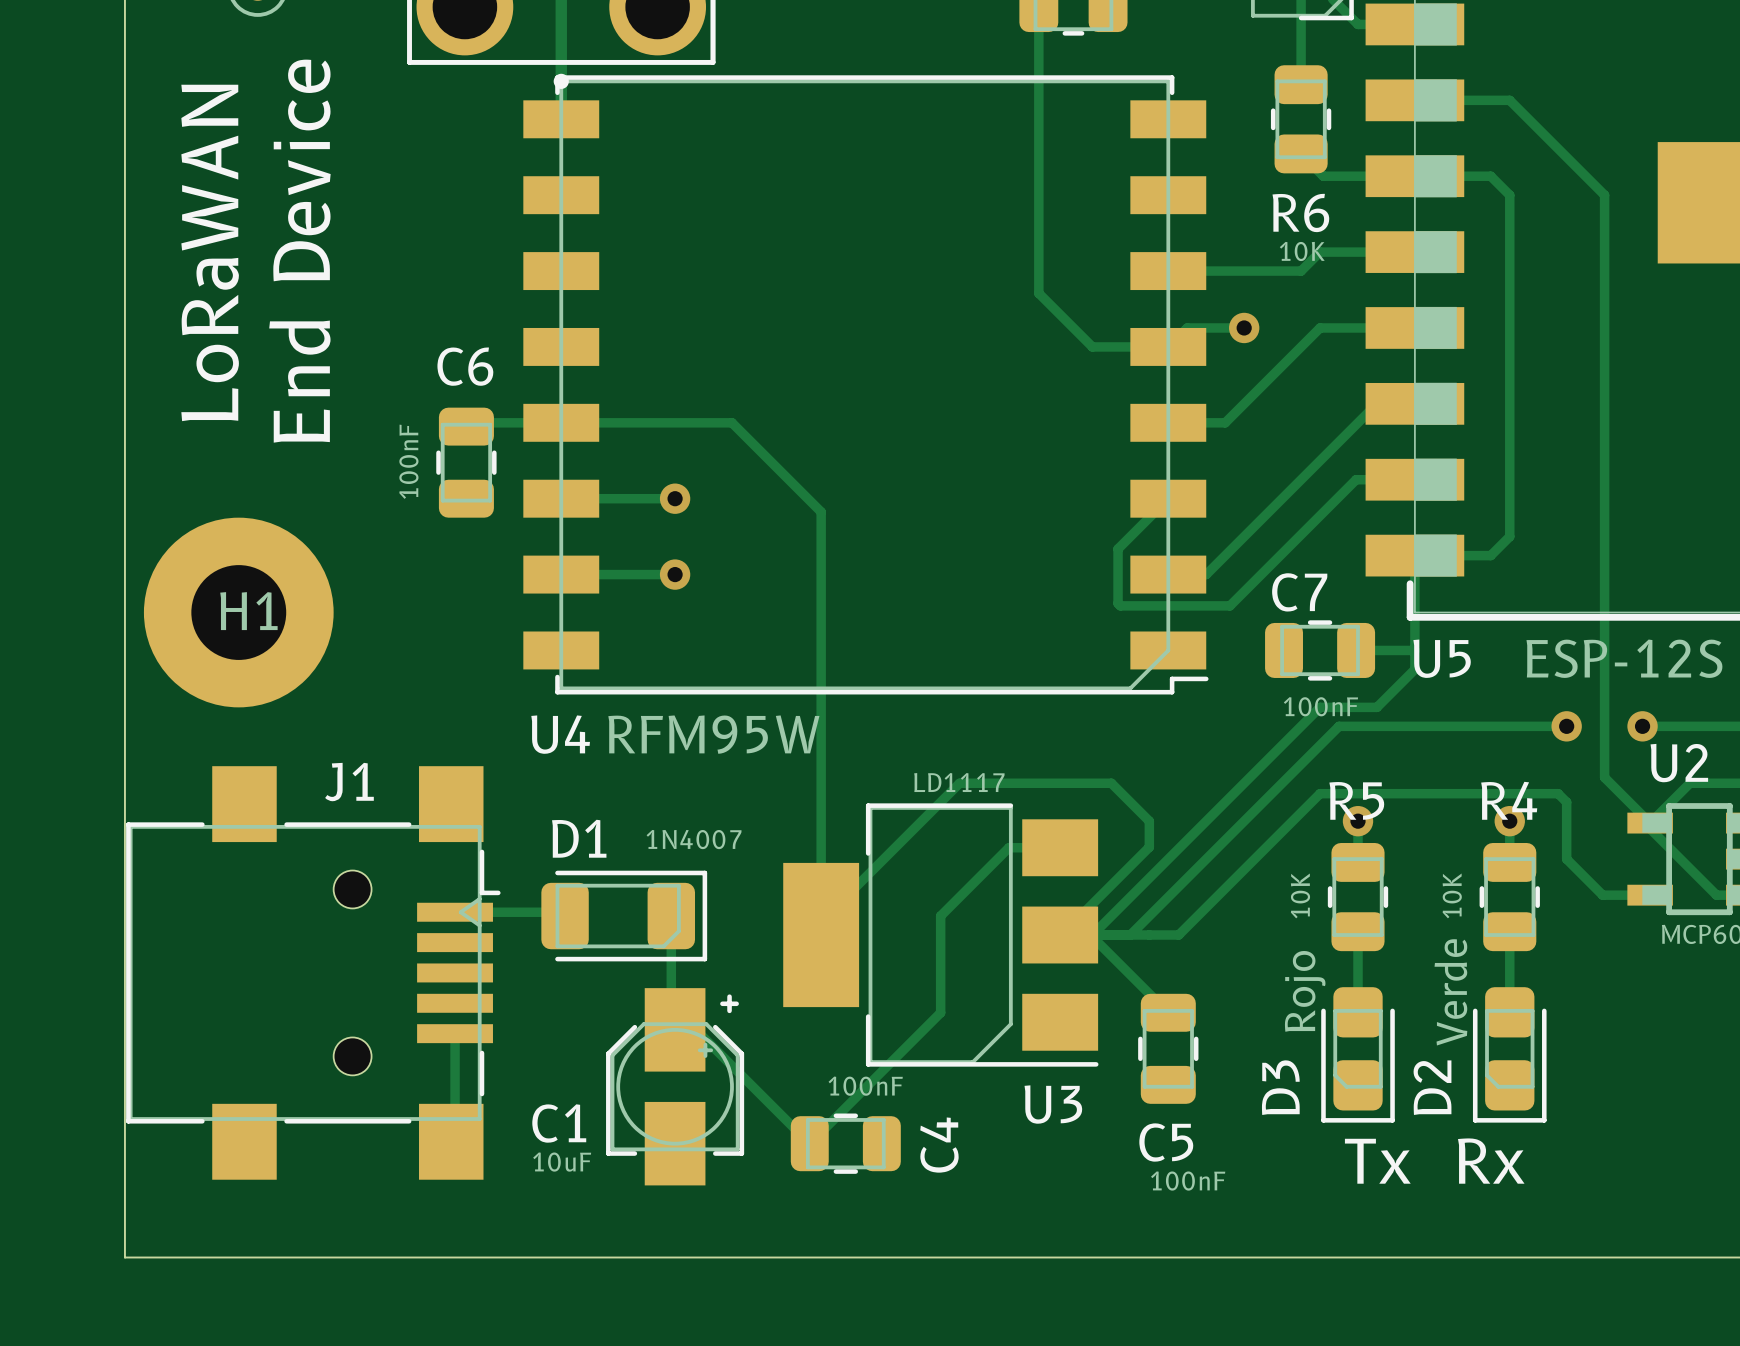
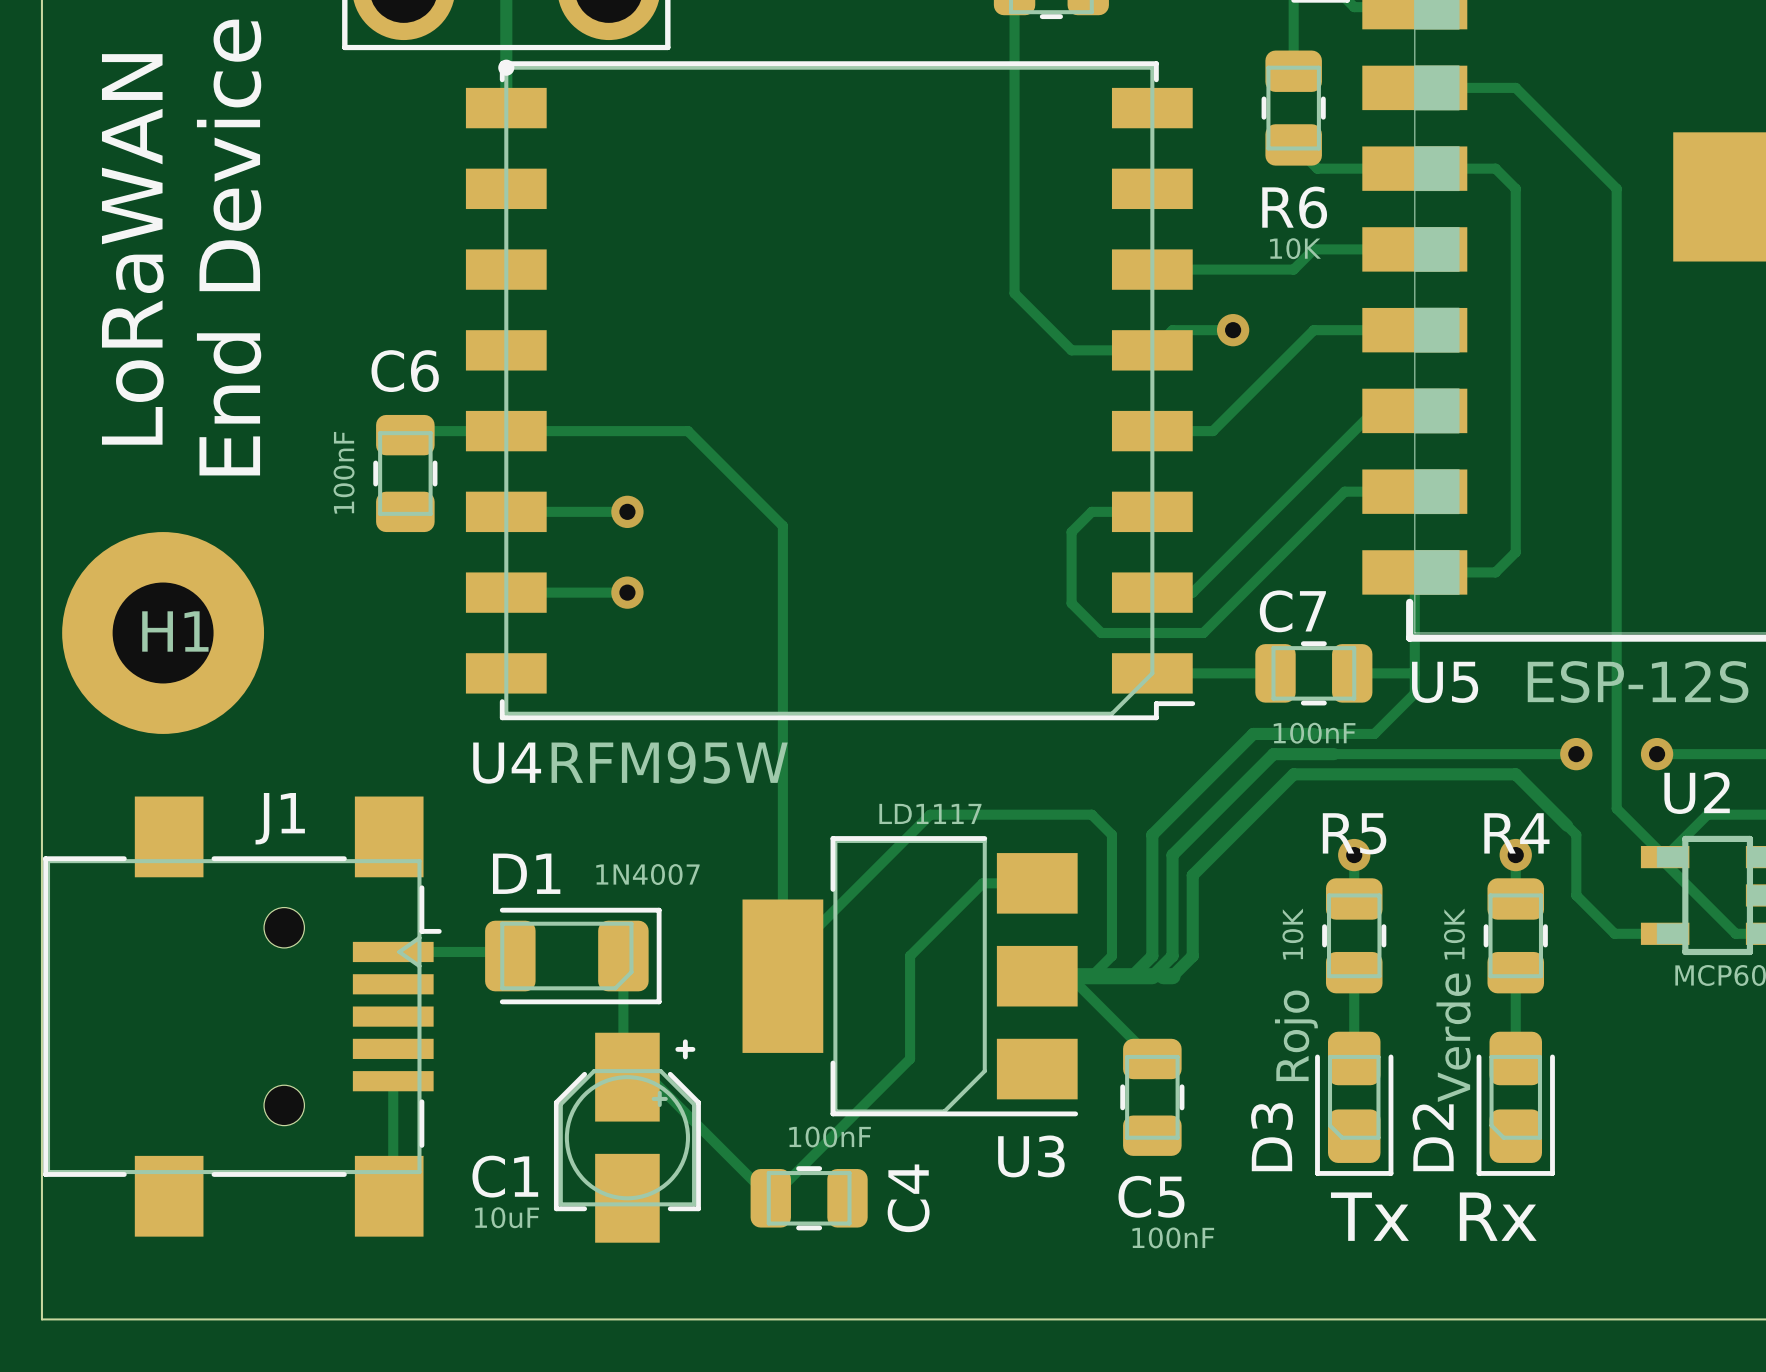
track: (1356, 479) (1229, 605) (1120, 605) (1118, 603) (1118, 548) (1168, 498) -> (1352, 491) (1344, 491) (1203, 632) (1101, 632) (1071, 603) (1071, 532) (1091, 511) (1152, 511)
track: none -> (1152, 673) (1275, 673)
track: (1320, 707) (1092, 935) -> (1313, 733) (1253, 733) (1152, 834) (1152, 956) (1132, 976)
track: (1339, 726) (1130, 935) -> (1334, 754) (1273, 754) (1172, 855) (1172, 956) (1152, 976) (1037, 976)
track: (1558, 793) (1320, 793) (1178, 935) -> (1567, 825) (1515, 774) (1293, 774) (1192, 875) (1192, 956) (1172, 976) (1163, 976)
track: (1130, 802) (1149, 821) (1149, 847) (1061, 935) -> (1111, 834) (1111, 956) (1091, 976)

